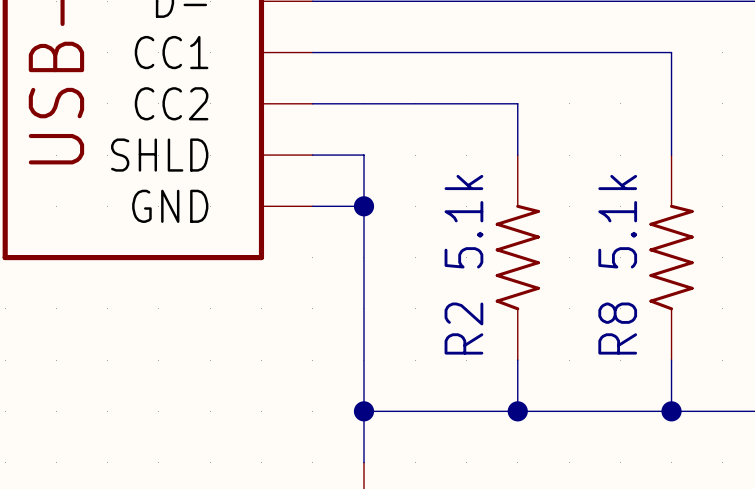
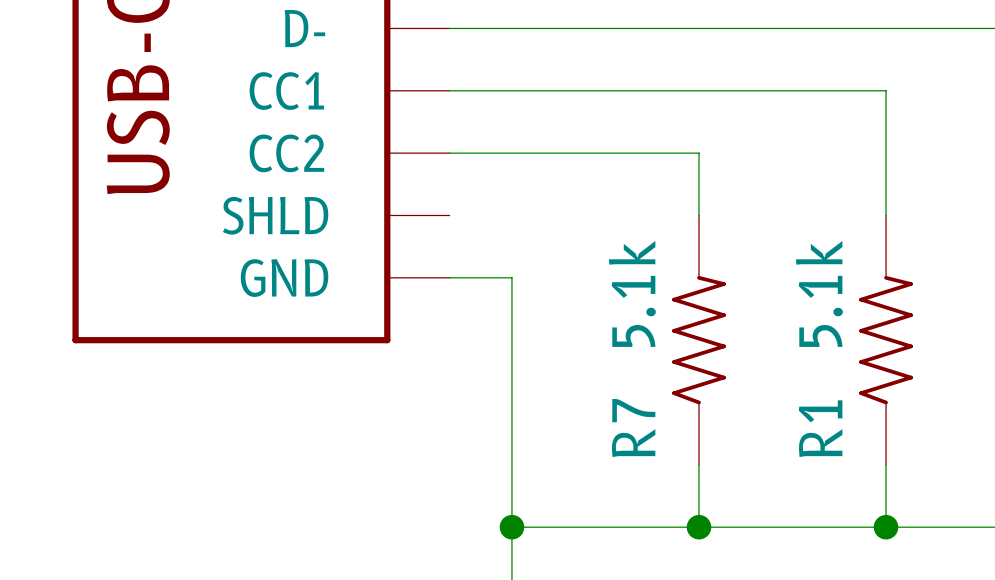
wire: (312, 155) (363, 155) (363, 206) -> none
junction: (363, 206) -> none
R2 name: R2 (463, 328) -> R7 (633, 428)
R8 name: R8 (617, 328) -> R1 (820, 428)

